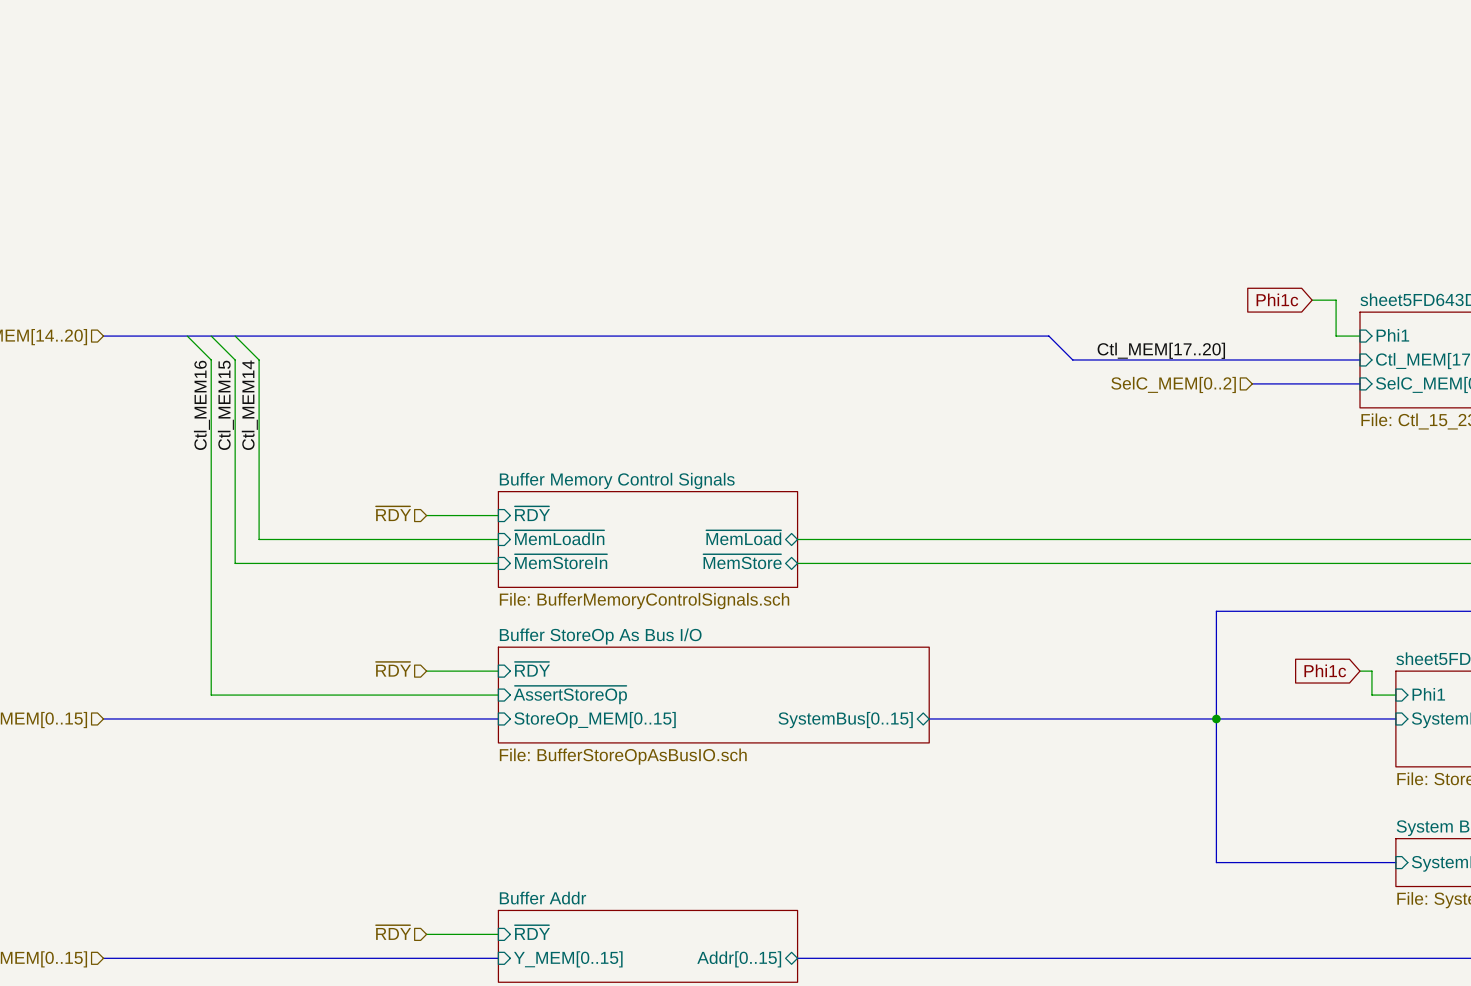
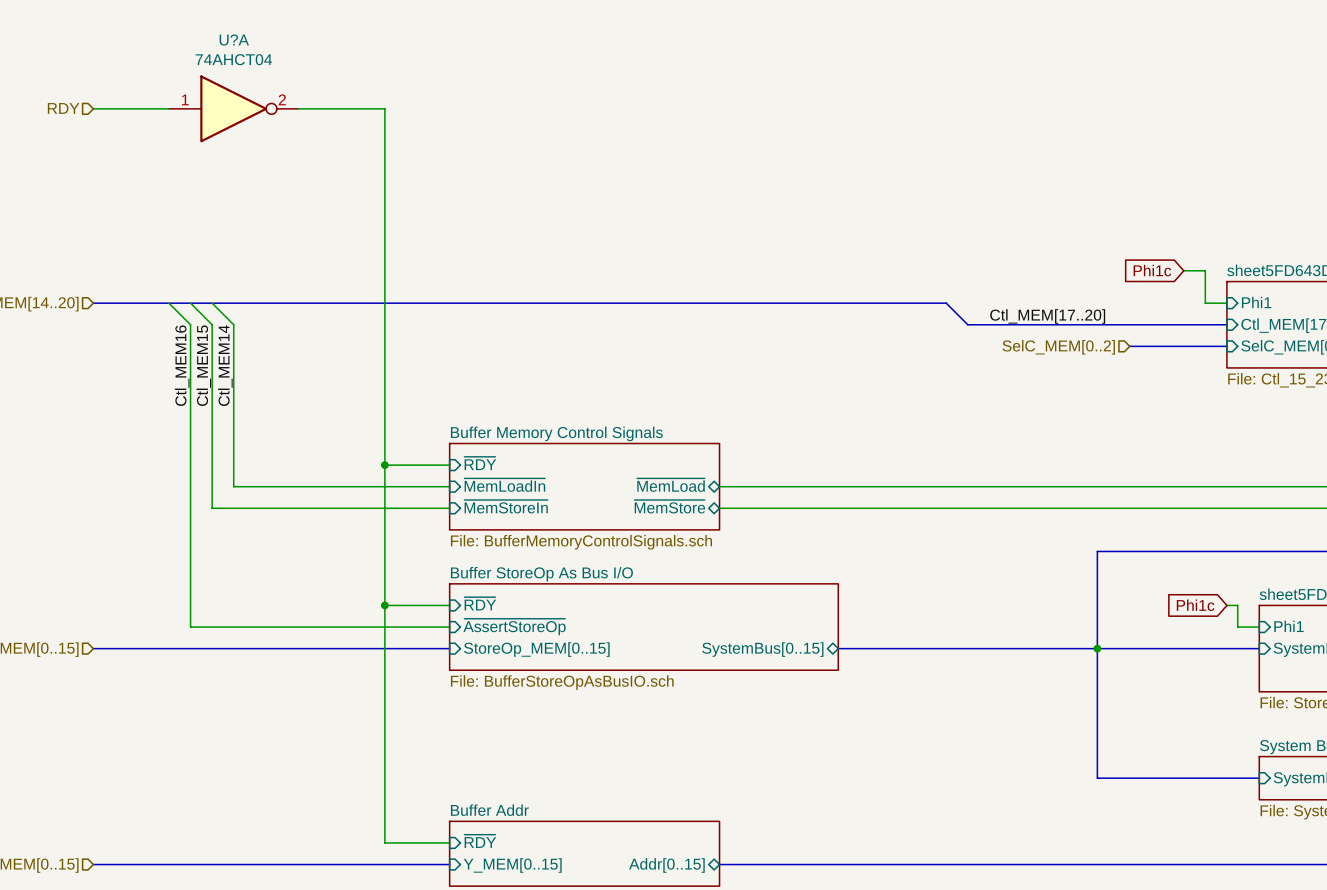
hierarchical label: none -> RDY (63, 108)
wire: none -> (93, 108) (168, 108)
U?A: none -> 74AHCT04 (233, 108)
wire: none -> (298, 108) (384, 108) (384, 842)
hierarchical label: ~{RDY} (393, 513) -> none
junction: none -> (384, 465)
hierarchical label: ~{RDY} (393, 669) -> none
junction: none -> (384, 605)
hierarchical label: ~{RDY} (393, 932) -> none

